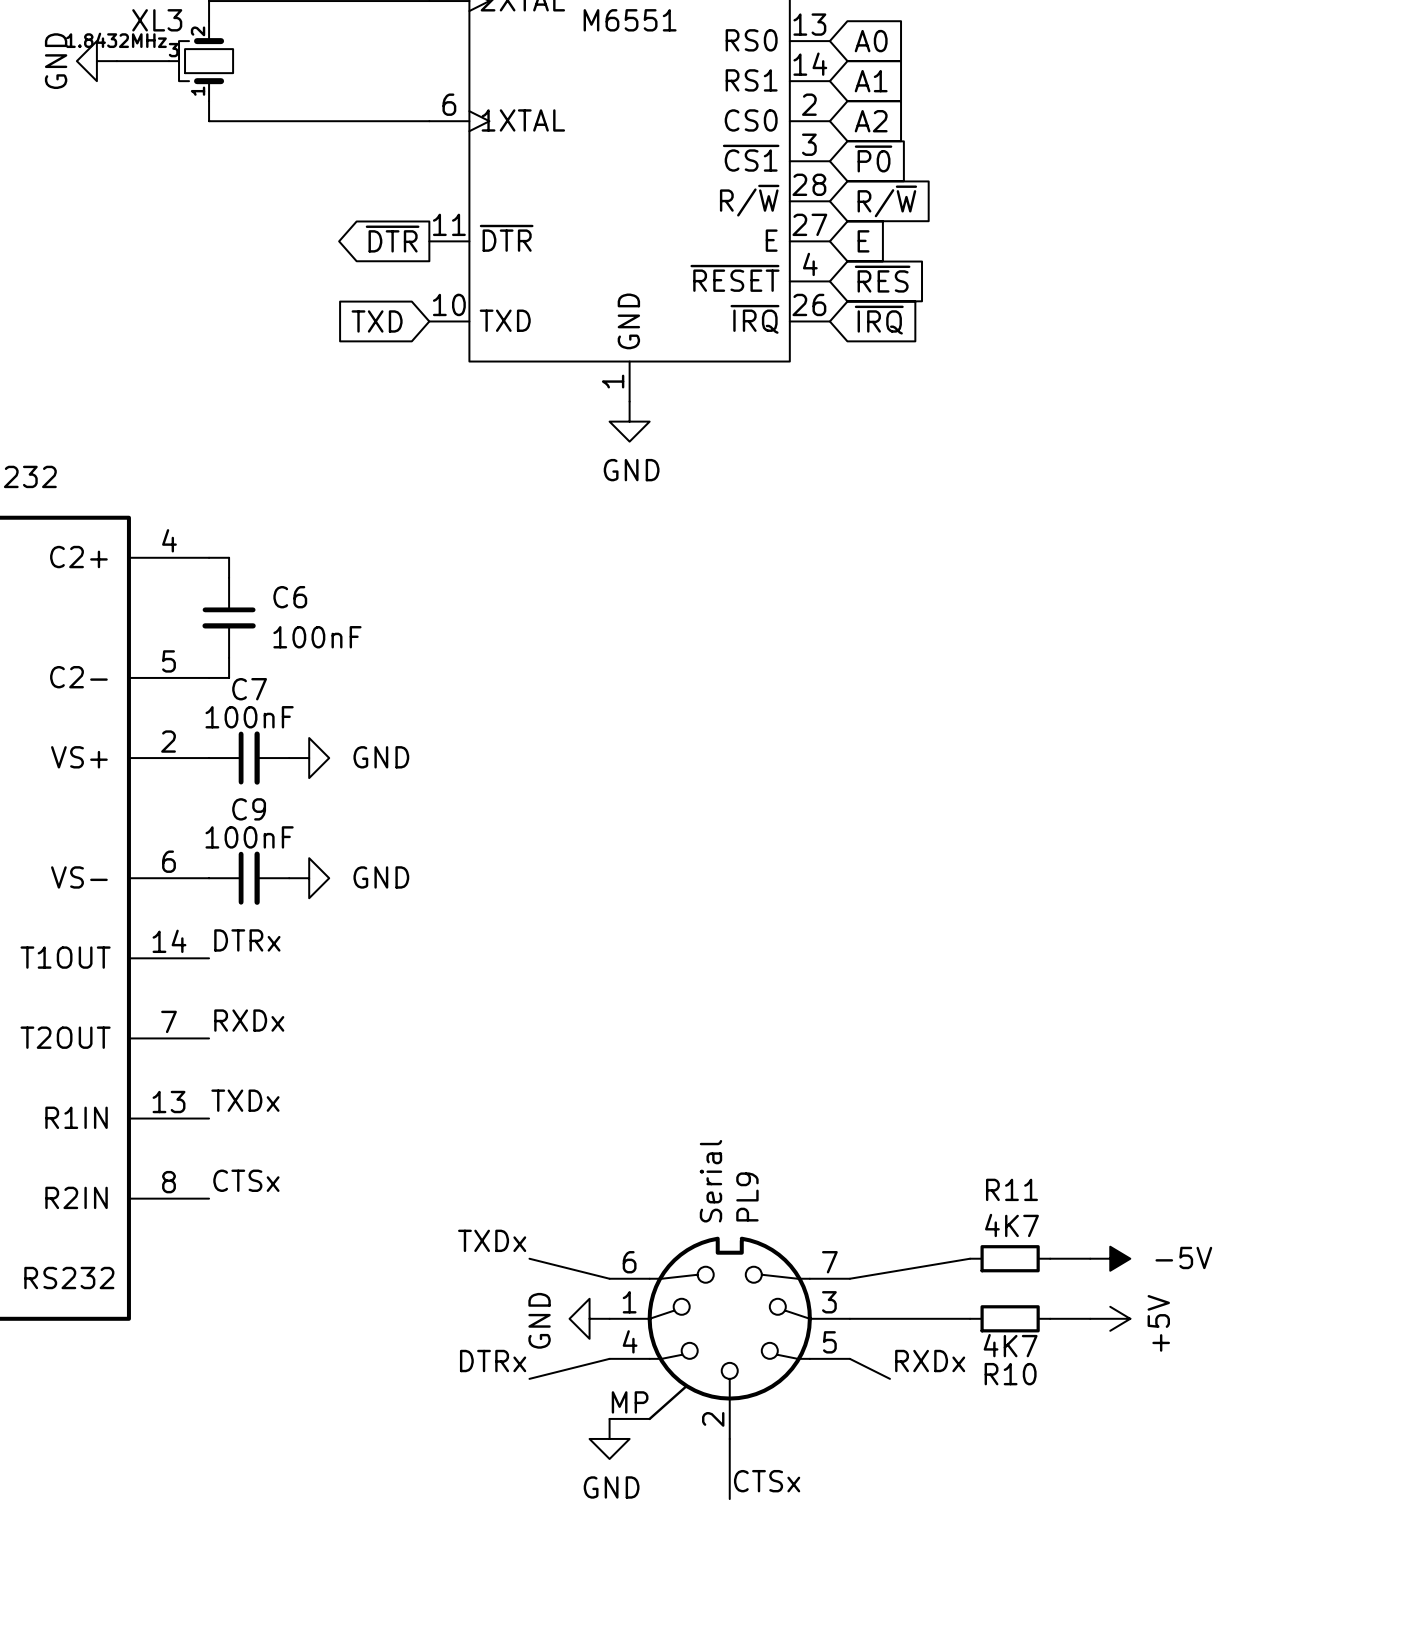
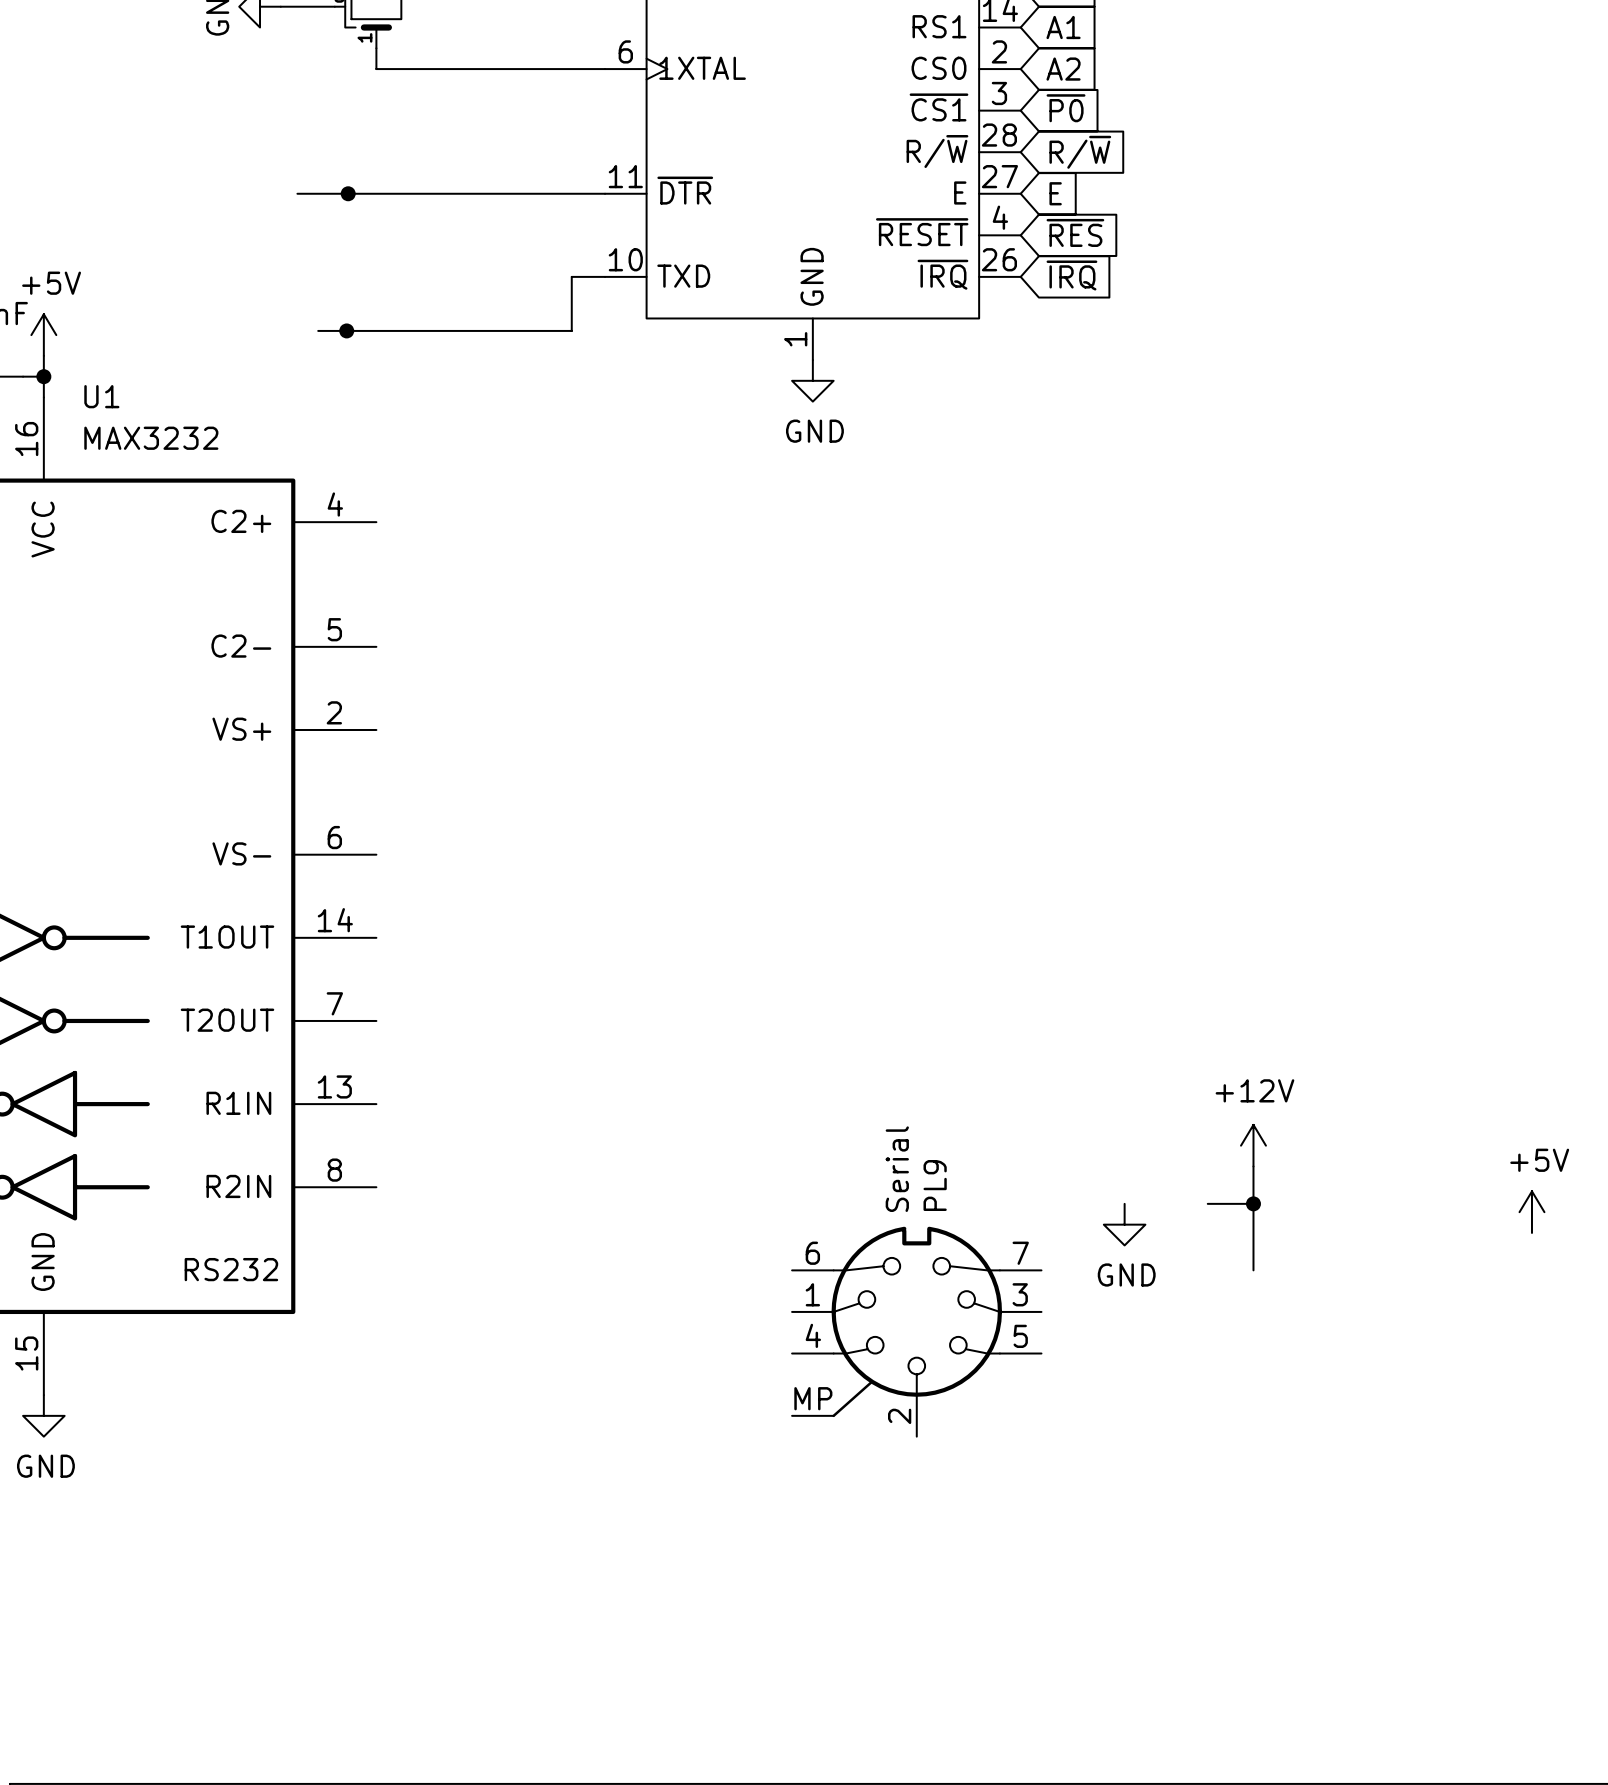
global label: ~{DTR} (392, 239) -> none
wire: none -> (297, 193) (605, 193)
junction: none -> (348, 193)
global label: TXD (377, 321) -> none
wire: none -> (605, 276) (571, 276) (571, 330) (318, 330)
junction: none -> (346, 330)
wire: (209, 557) (229, 557) (229, 577) -> none
C6: 100nF (229, 617) -> none
wire: (229, 657) (229, 677) (209, 677) -> none
C7: 100nF (249, 758) -> none
power symbol: GND (309, 758) -> none
C9: 100nF (249, 878) -> none
power symbol: GND (309, 878) -> none
label: DTRx (247, 940) -> none
label: RXDx (249, 1020) -> none
label: TXDx (245, 1100) -> none
power symbol: none -> +12V (1253, 1145)
wire: none -> (1253, 1166) (1253, 1270)
label: CTSx (246, 1180) -> none
wire: none -> (1207, 1203) (1253, 1203)
junction: none -> (1253, 1203)
power symbol: none -> GND (1124, 1224)
label: TXDx (492, 1240) -> none
wire: (529, 1258) (609, 1278) -> none
wire: (970, 1258) (849, 1278) -> none
R11: 4K7 (1010, 1258) -> none
wire: (1050, 1258) (1090, 1258) -> none
power symbol: -5V (1110, 1258) -> none
power symbol: GND (589, 1318) -> none
wire: (849, 1318) (970, 1318) -> none
R10: 4K7 (1010, 1318) -> none
wire: (1050, 1318) (1090, 1318) -> none
power symbol rotation: 0° (1110, 1318) -> 90° counterclockwise (1531, 1212)
power symbol position: +5V (1110, 1318) -> +5V (1531, 1212)
wire: (609, 1358) (529, 1378) -> none
wire: (849, 1358) (889, 1378) -> none
label: DTRx (493, 1361) -> none
label: RXDx (930, 1361) -> none
power symbol: GND (609, 1438) -> none
wire: (729, 1438) (729, 1499) -> none
label: CTSx (767, 1481) -> none

